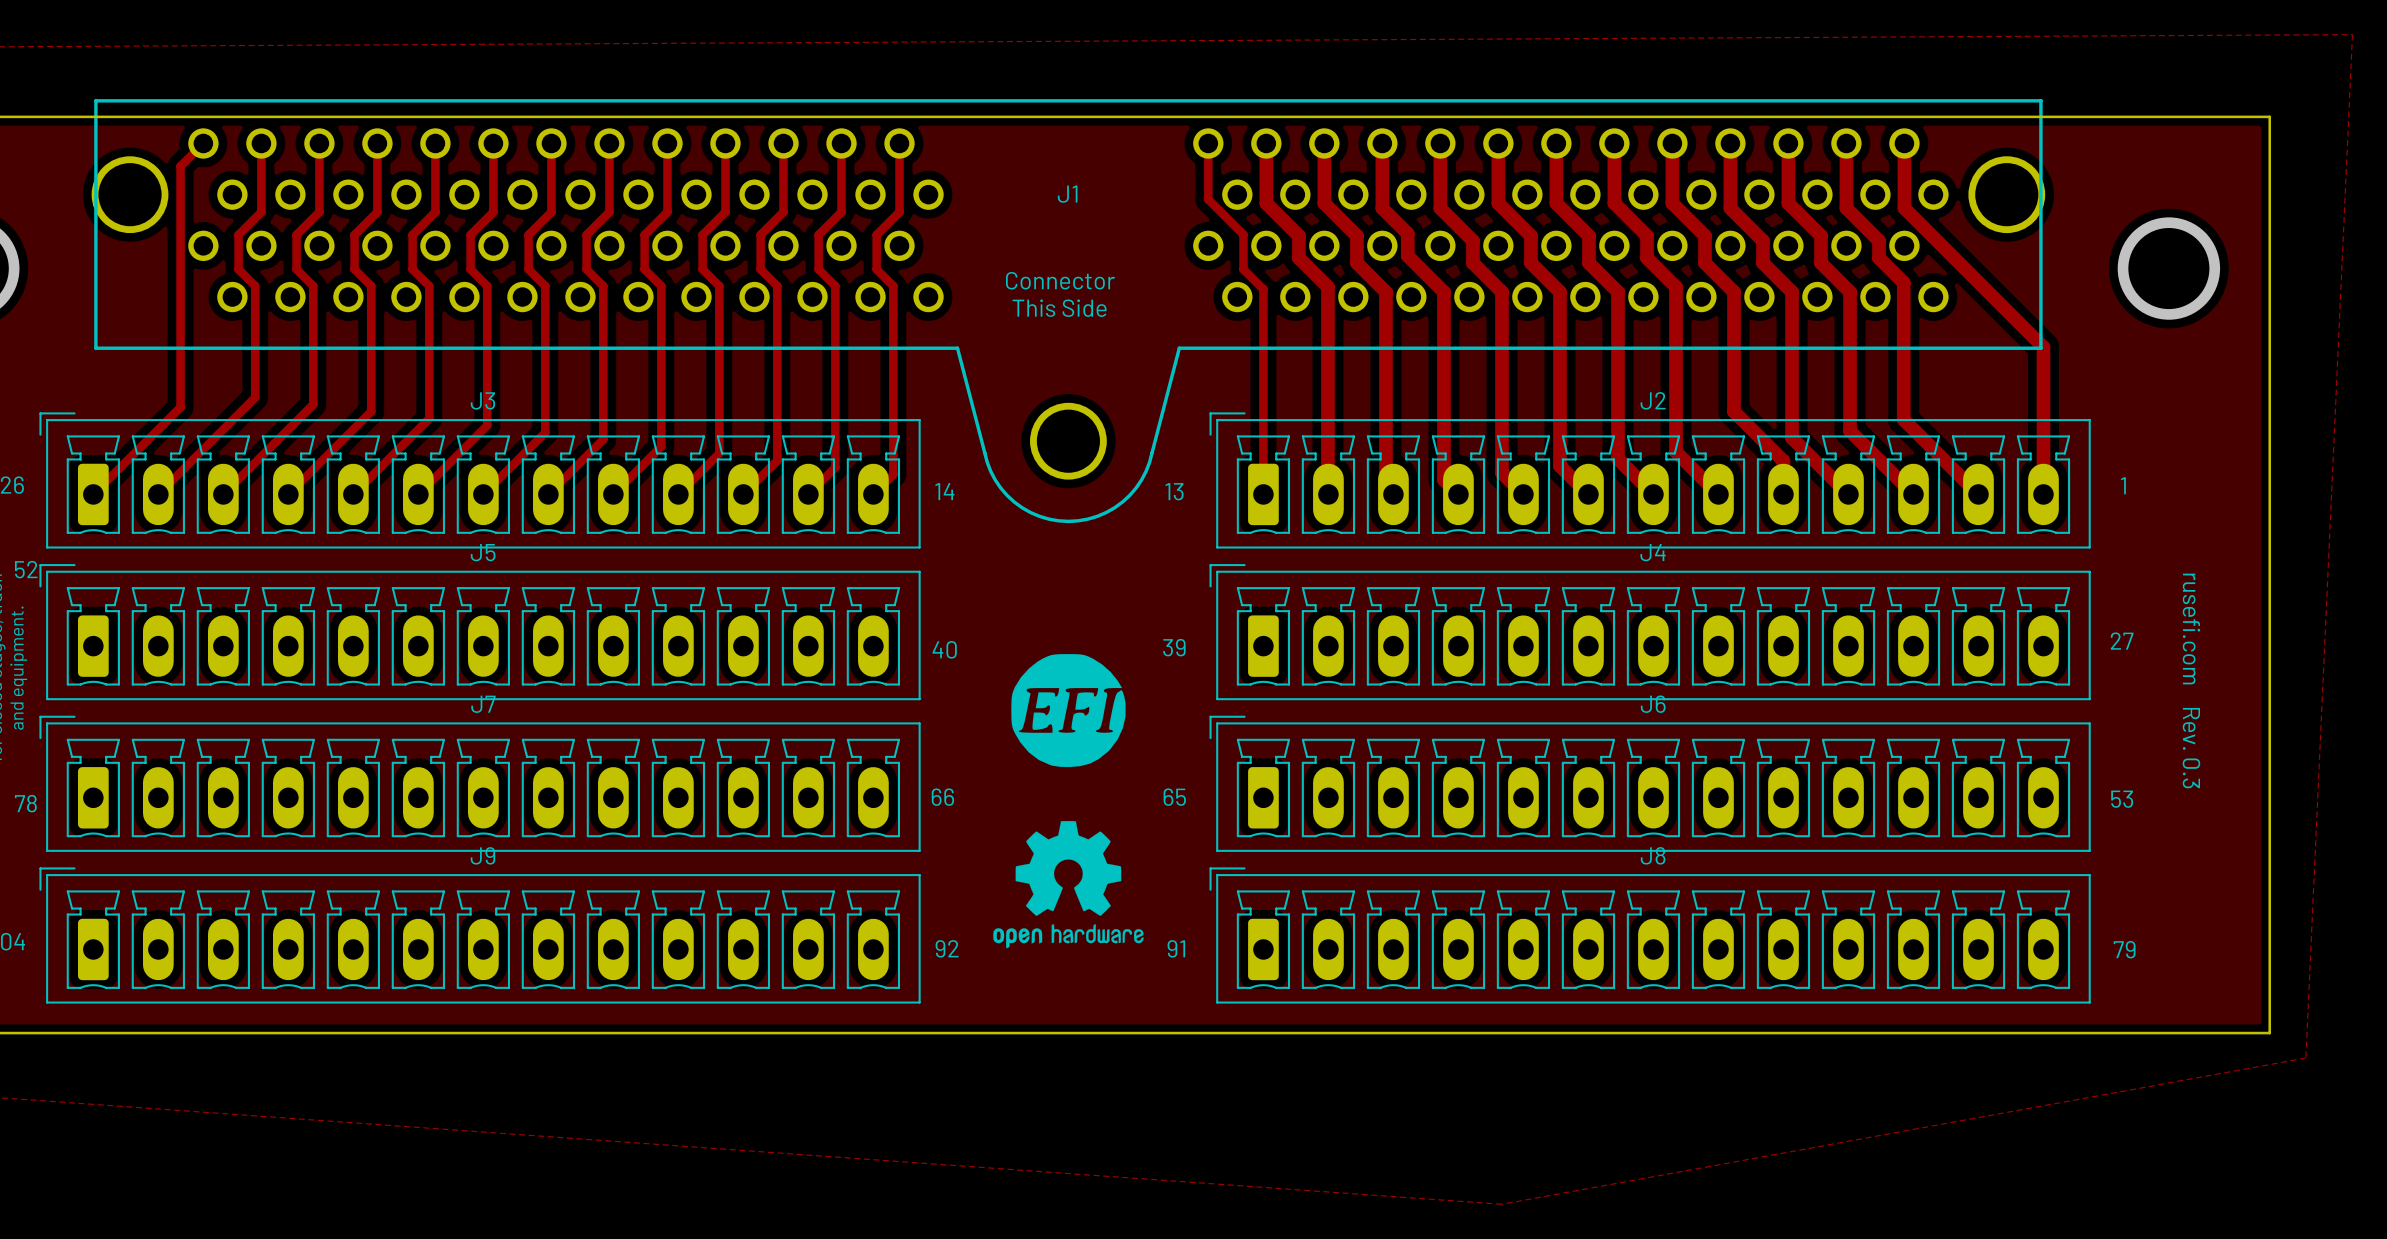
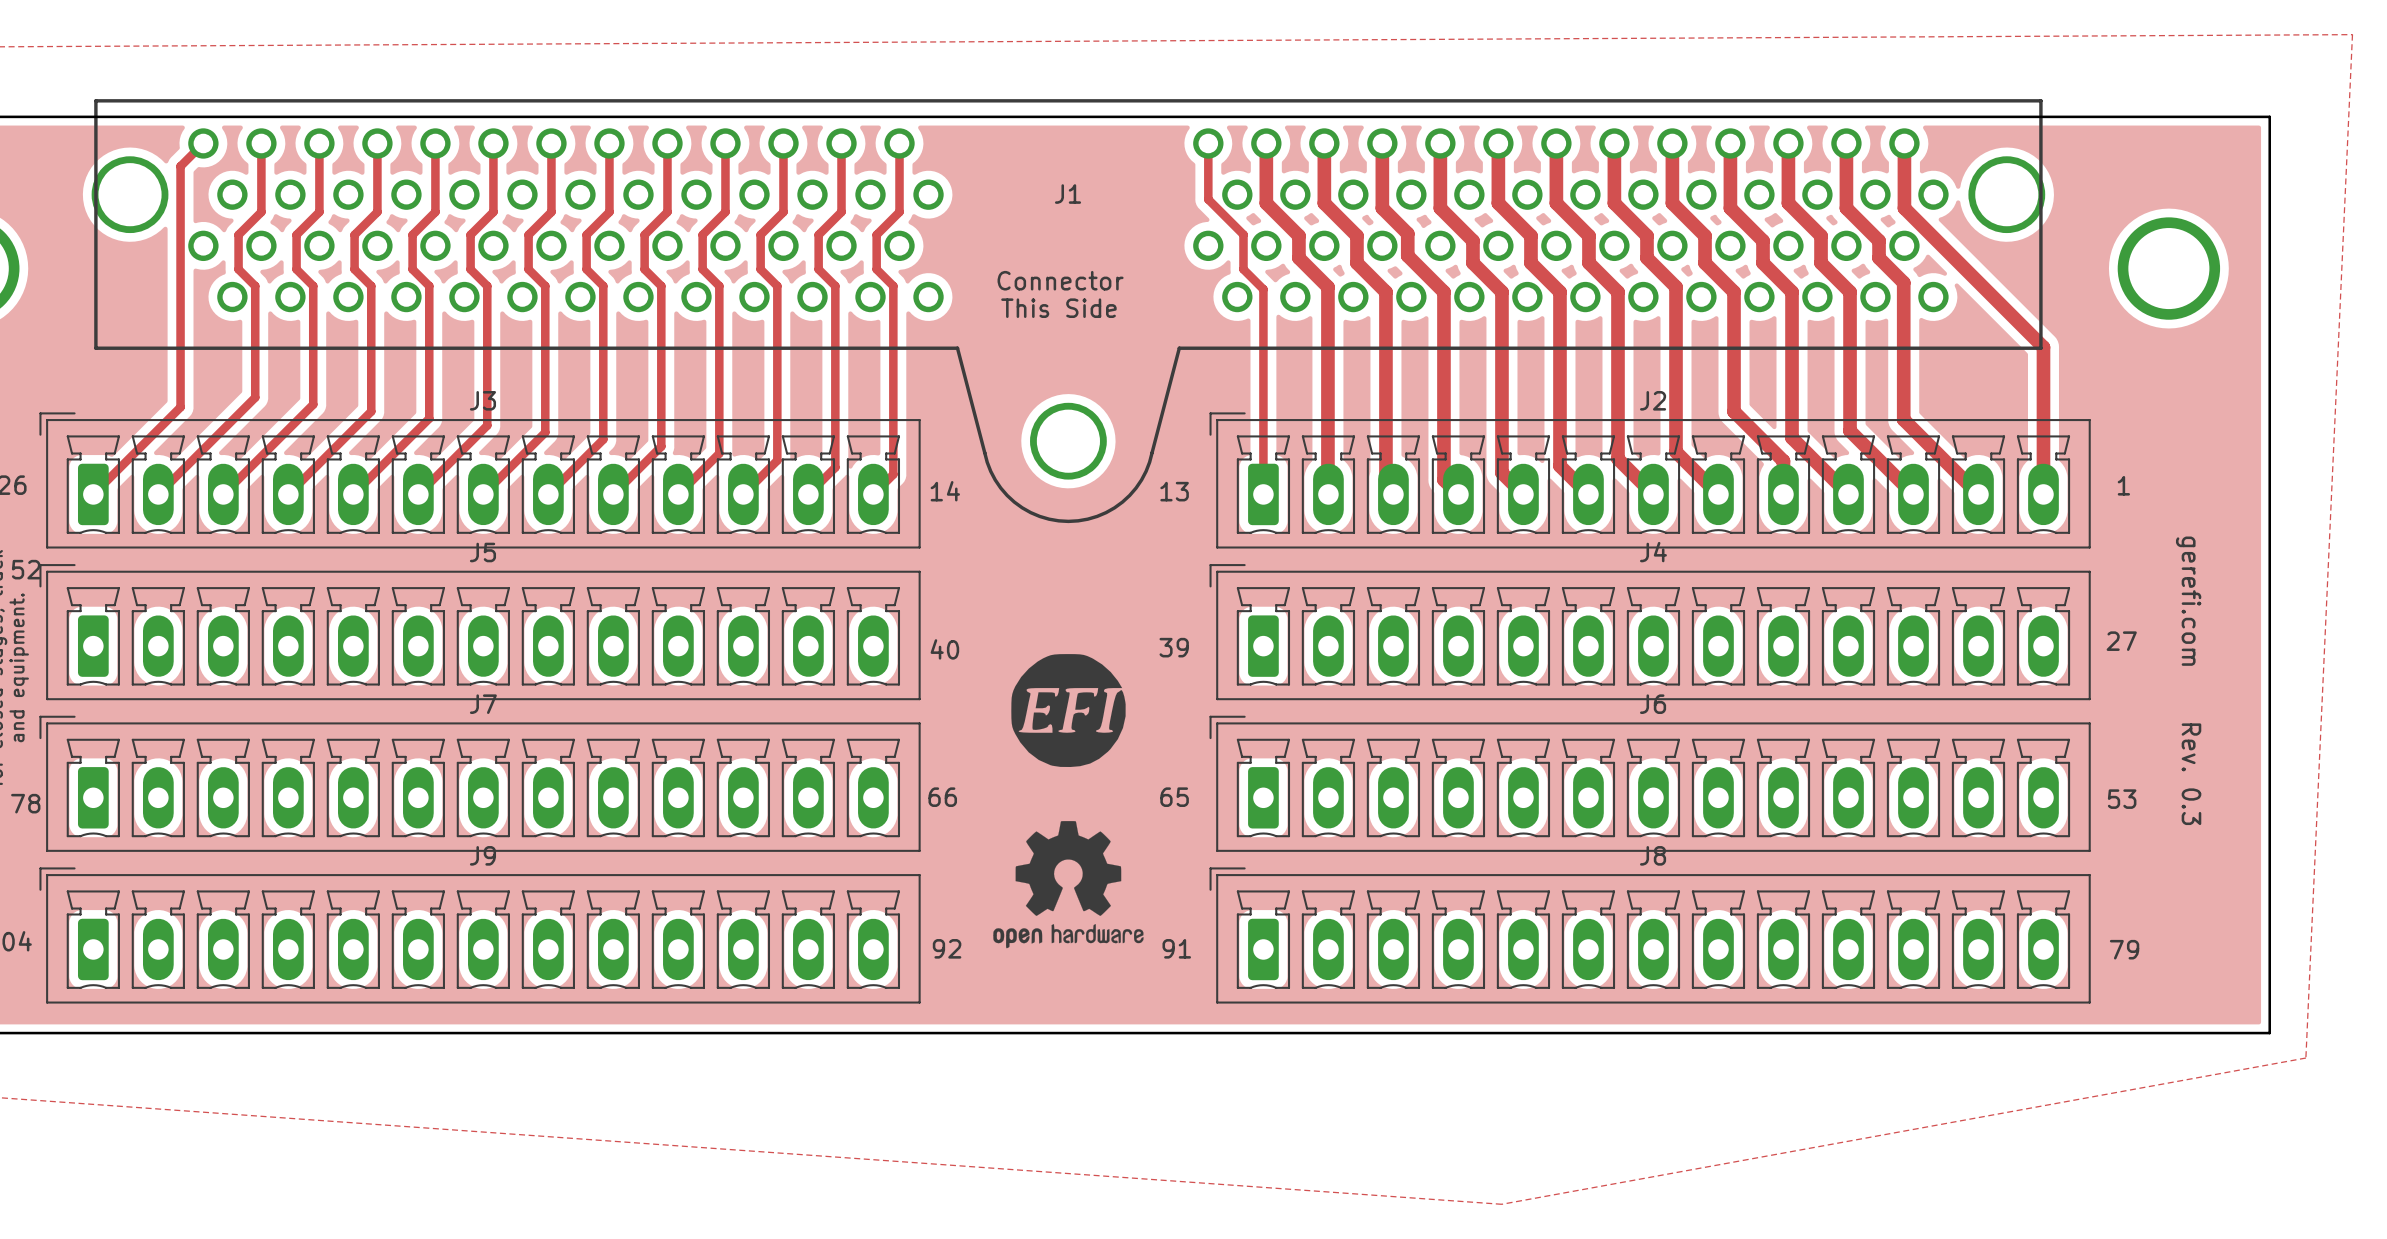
text: rusefi.com Rev. 0.3 (2191, 680) -> gerefi.com Rev. 0.3 (2188, 680)

